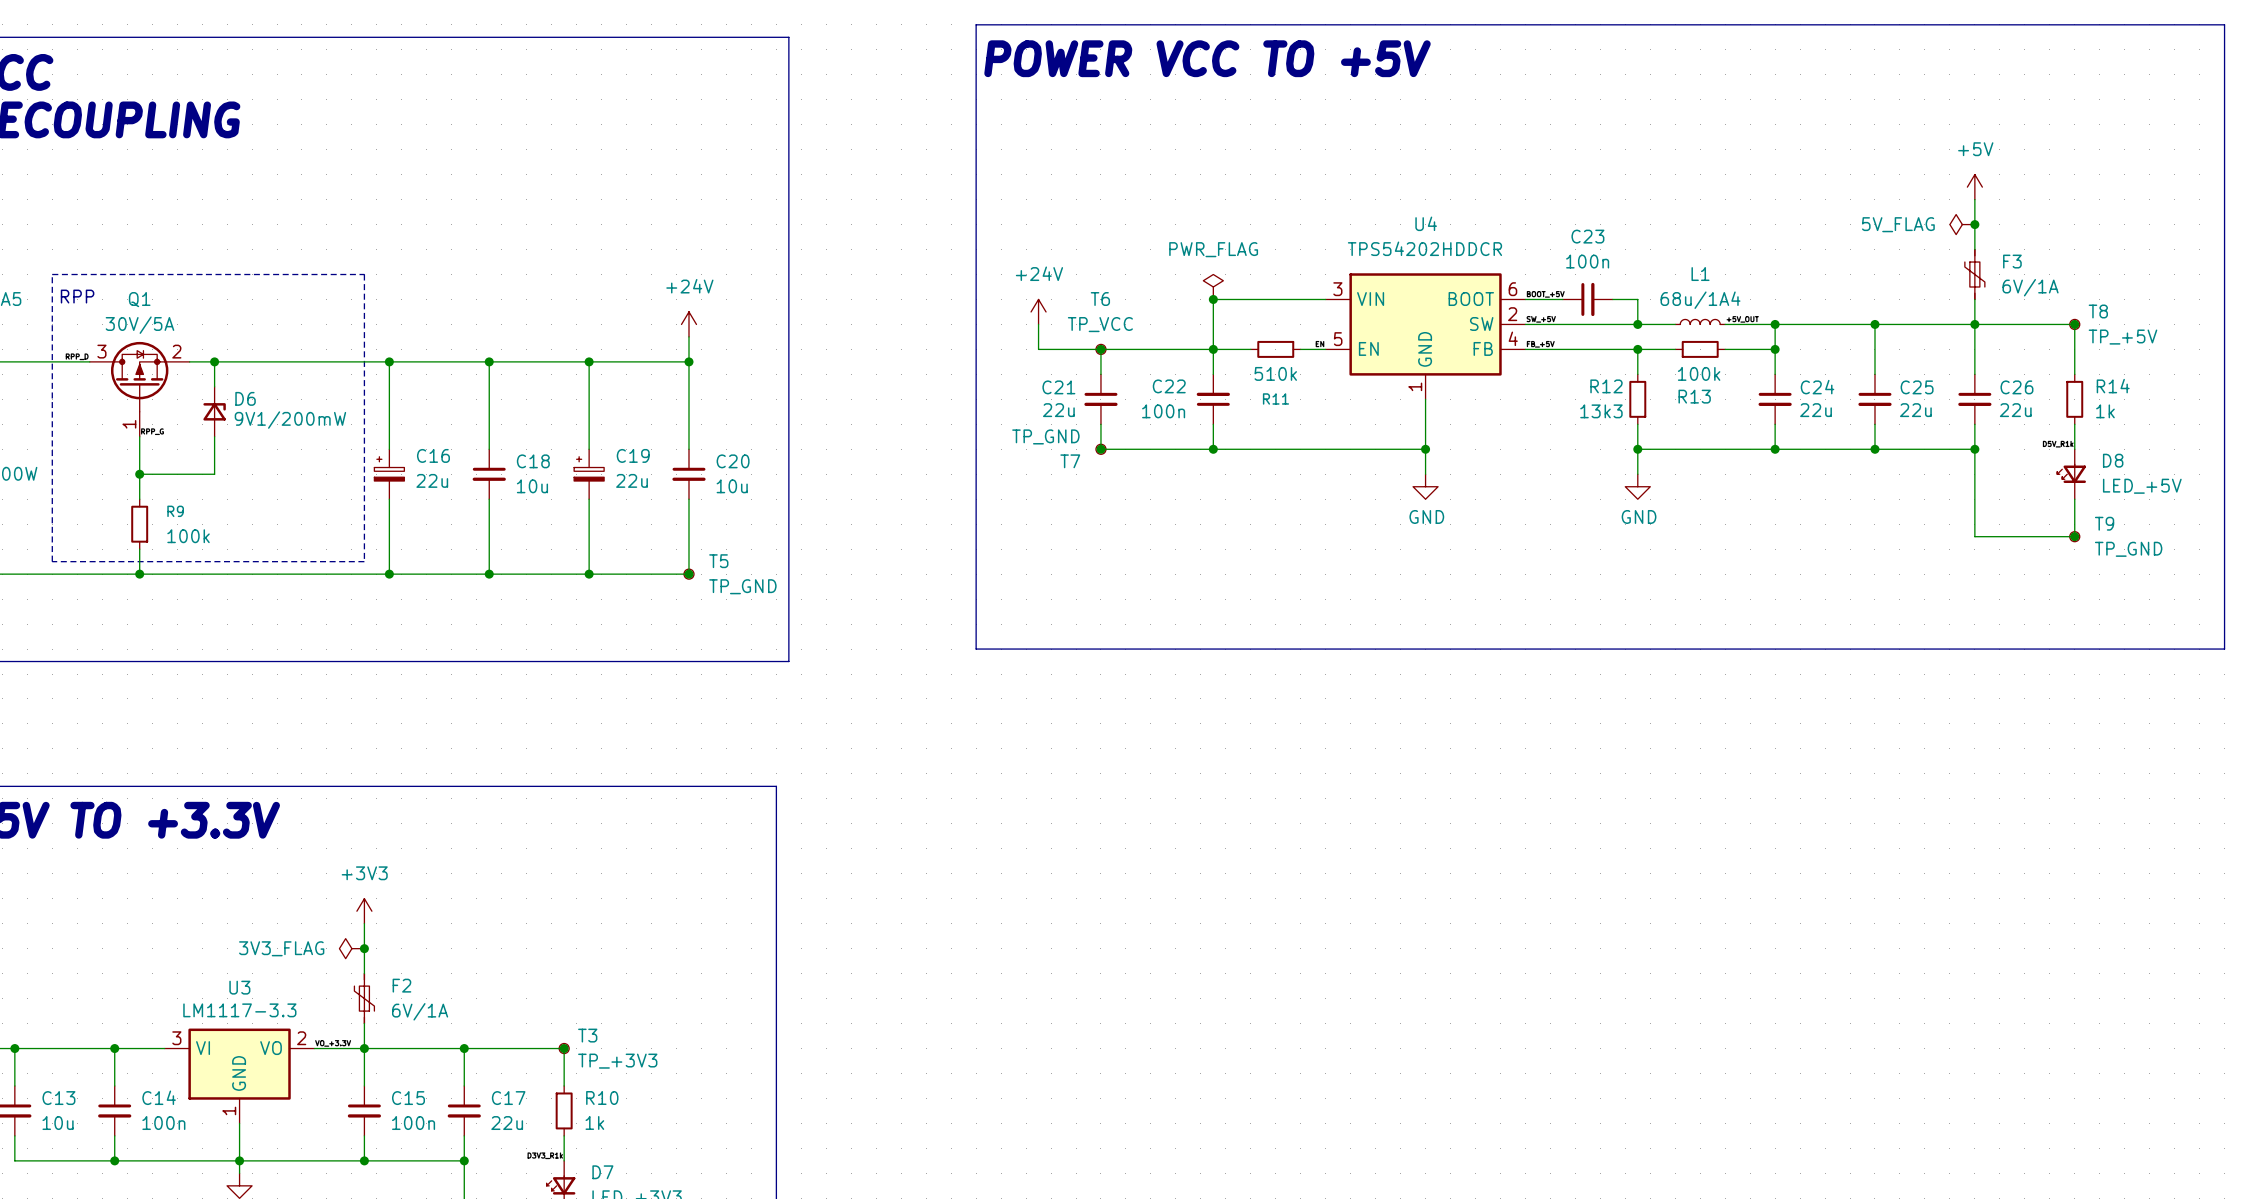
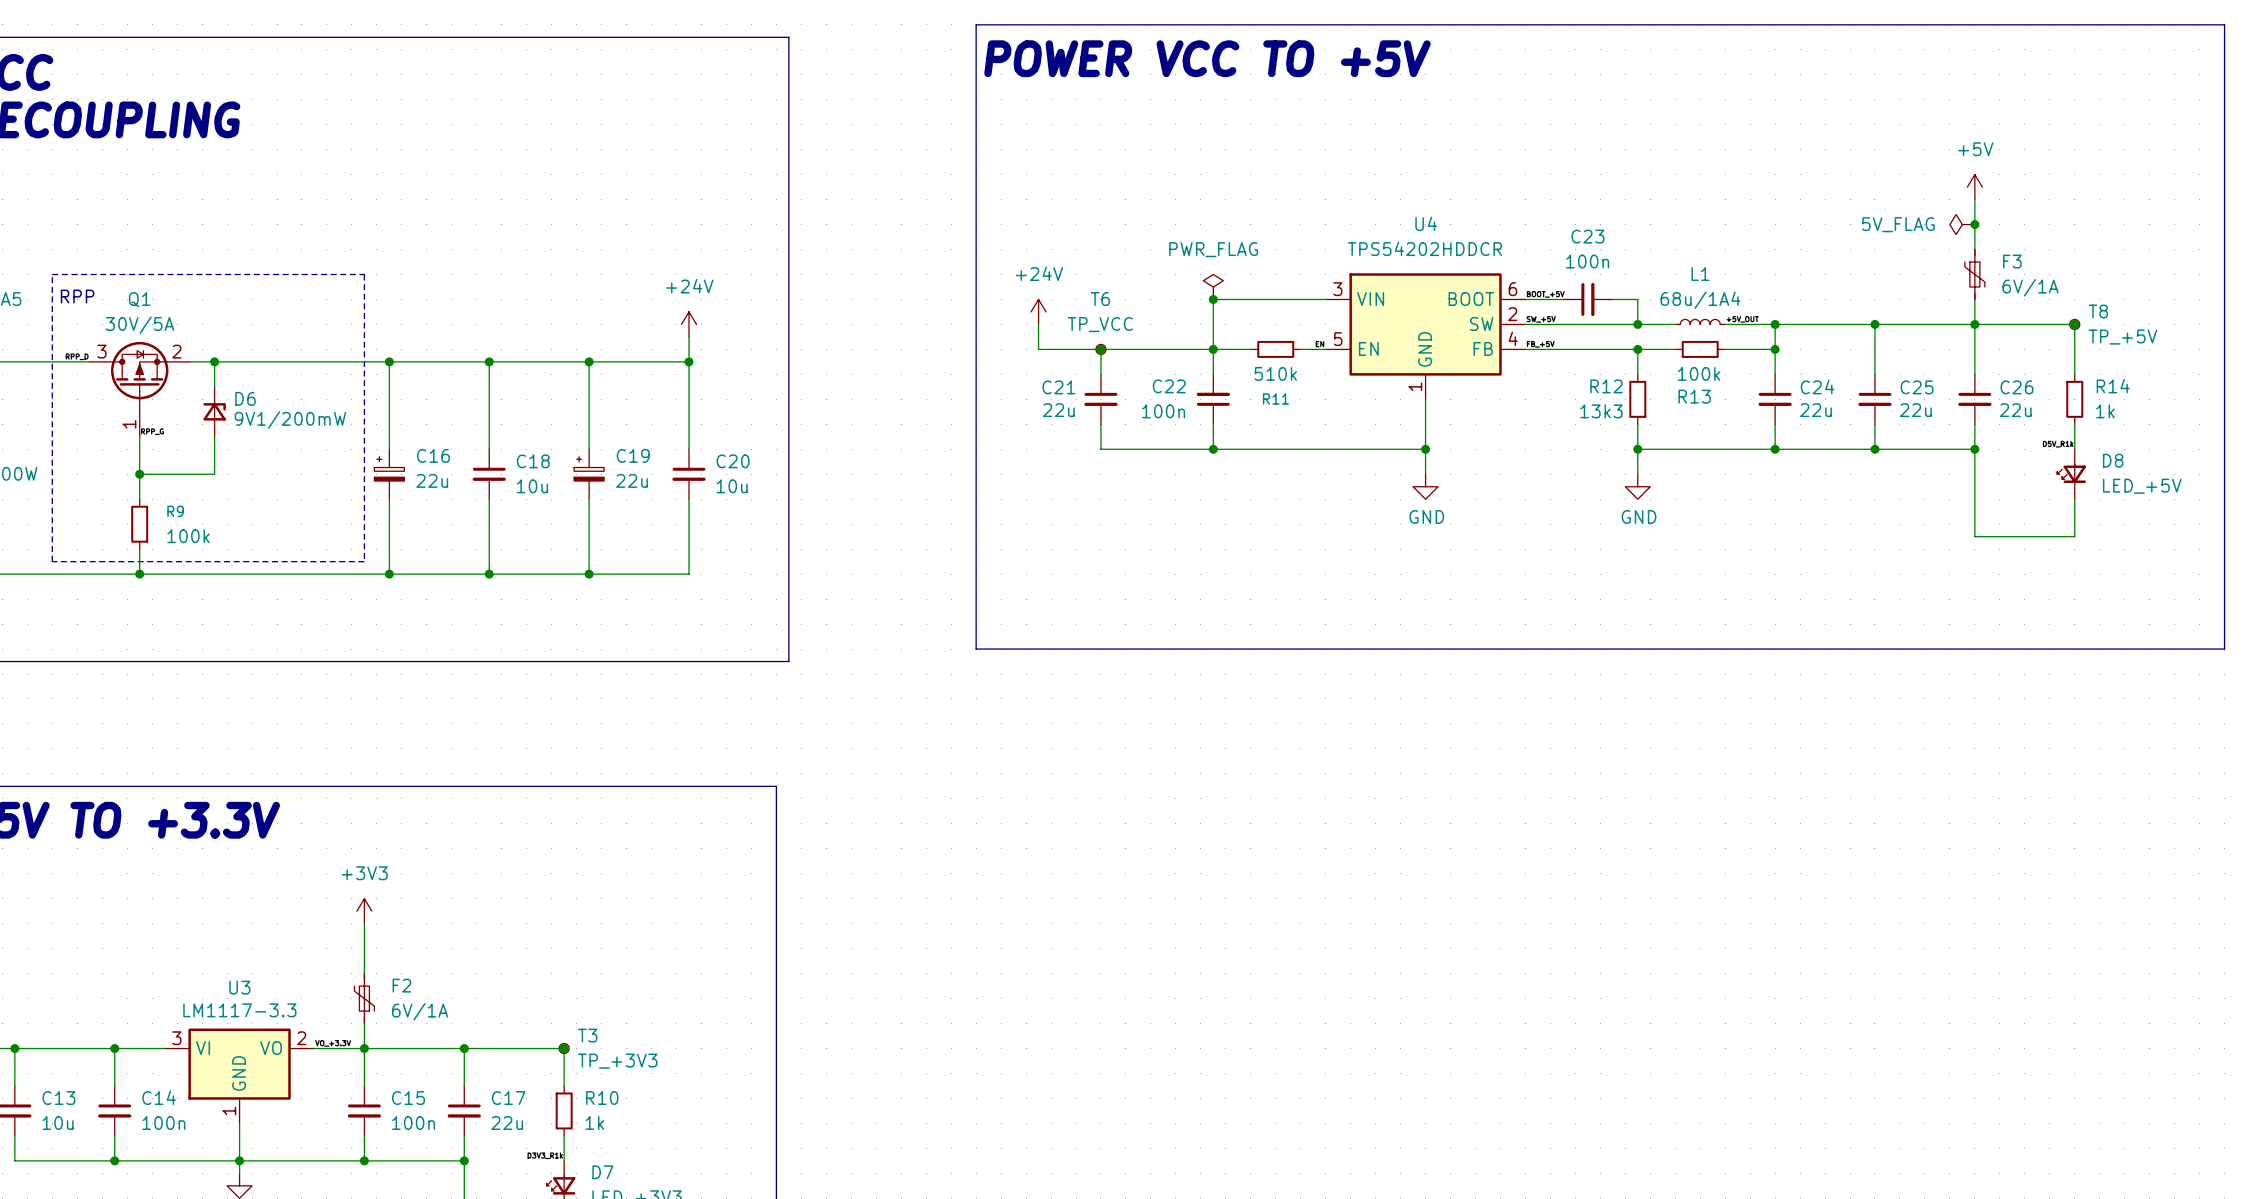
junction: (1100, 449) -> none
T7: TP_GND (1100, 449) -> none
junction: (2074, 536) -> none
T9: TP_GND (2074, 536) -> none
junction: (688, 574) -> none
T5: TP_GND (688, 574) -> none
power symbol: 3V3_FLAG (351, 948) -> none
junction: (364, 948) -> none

